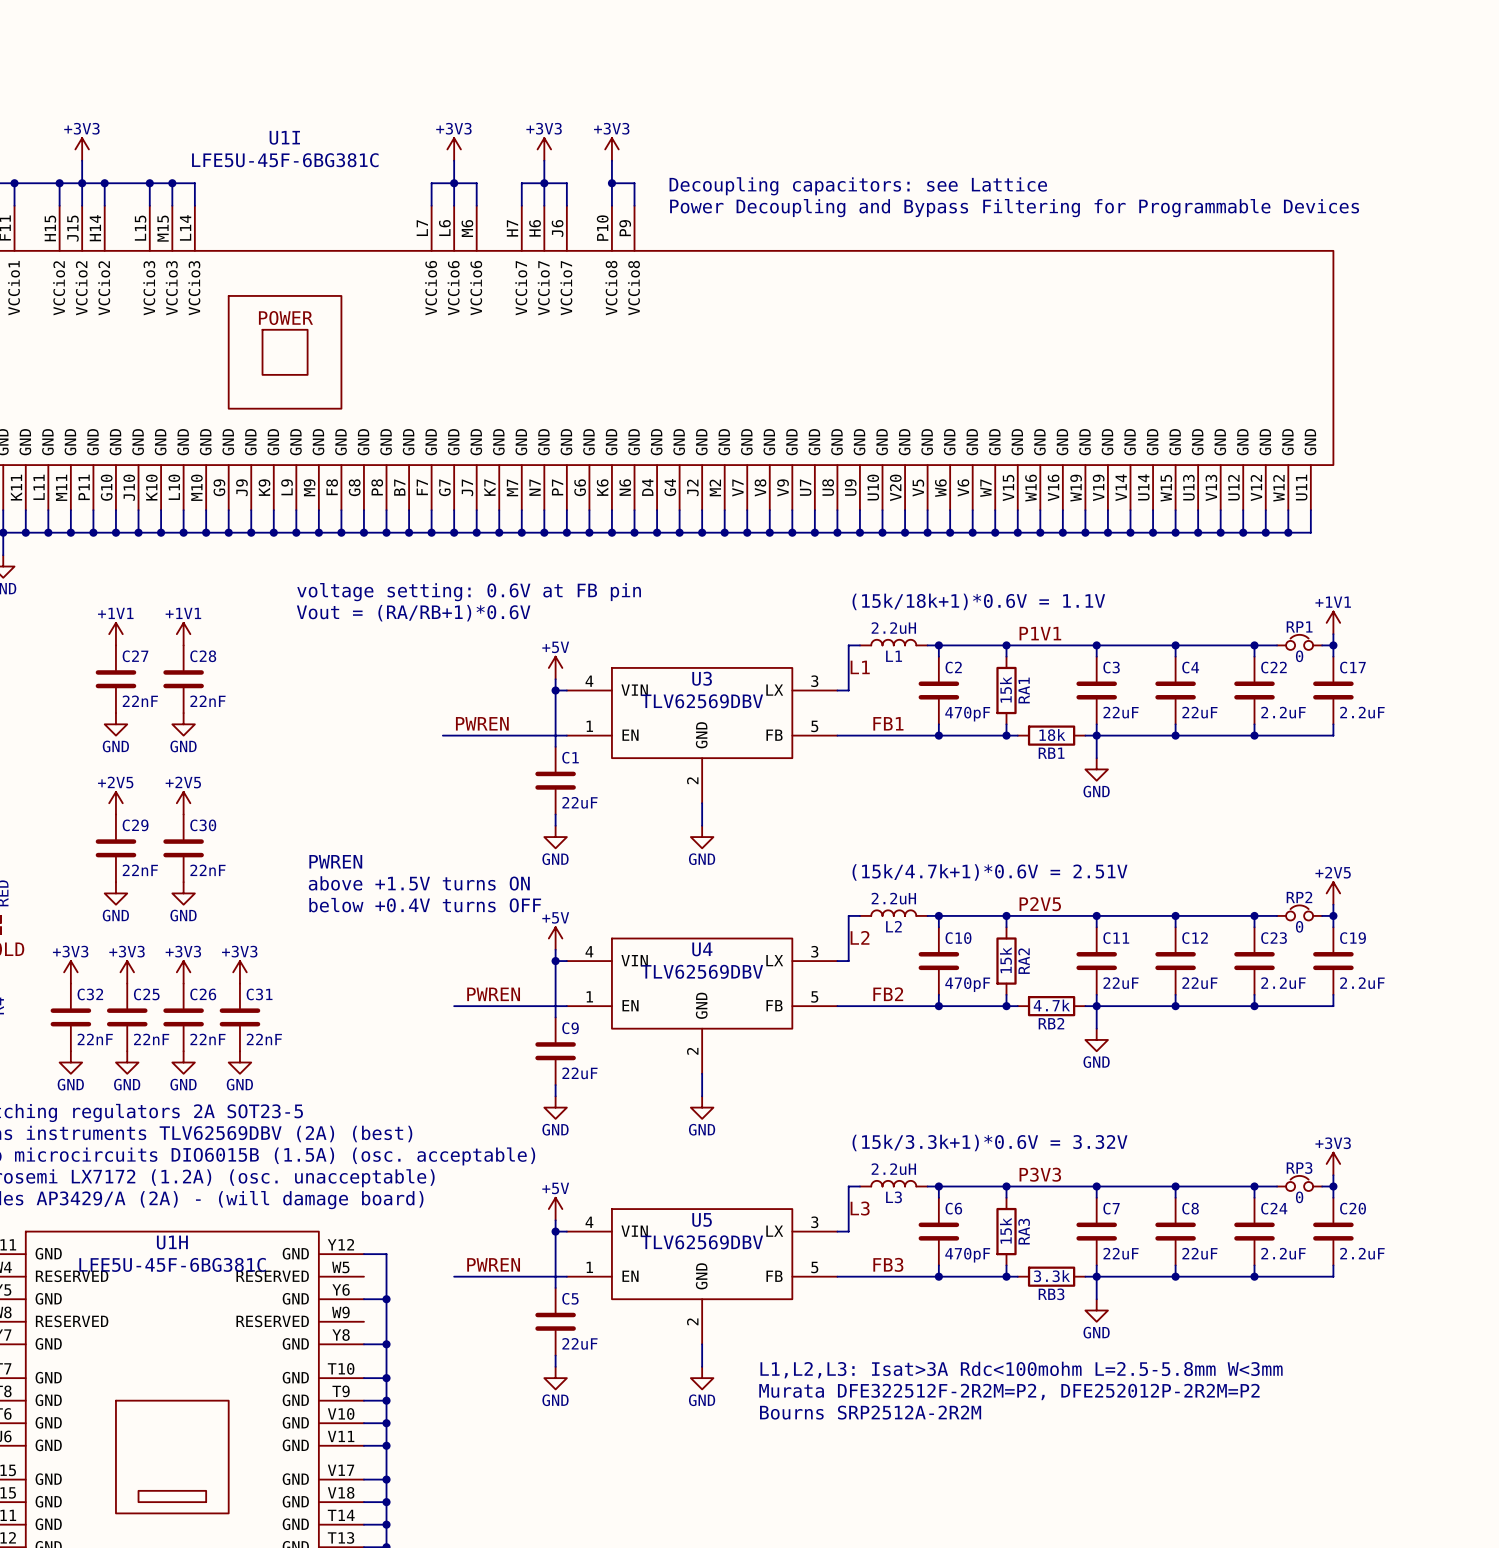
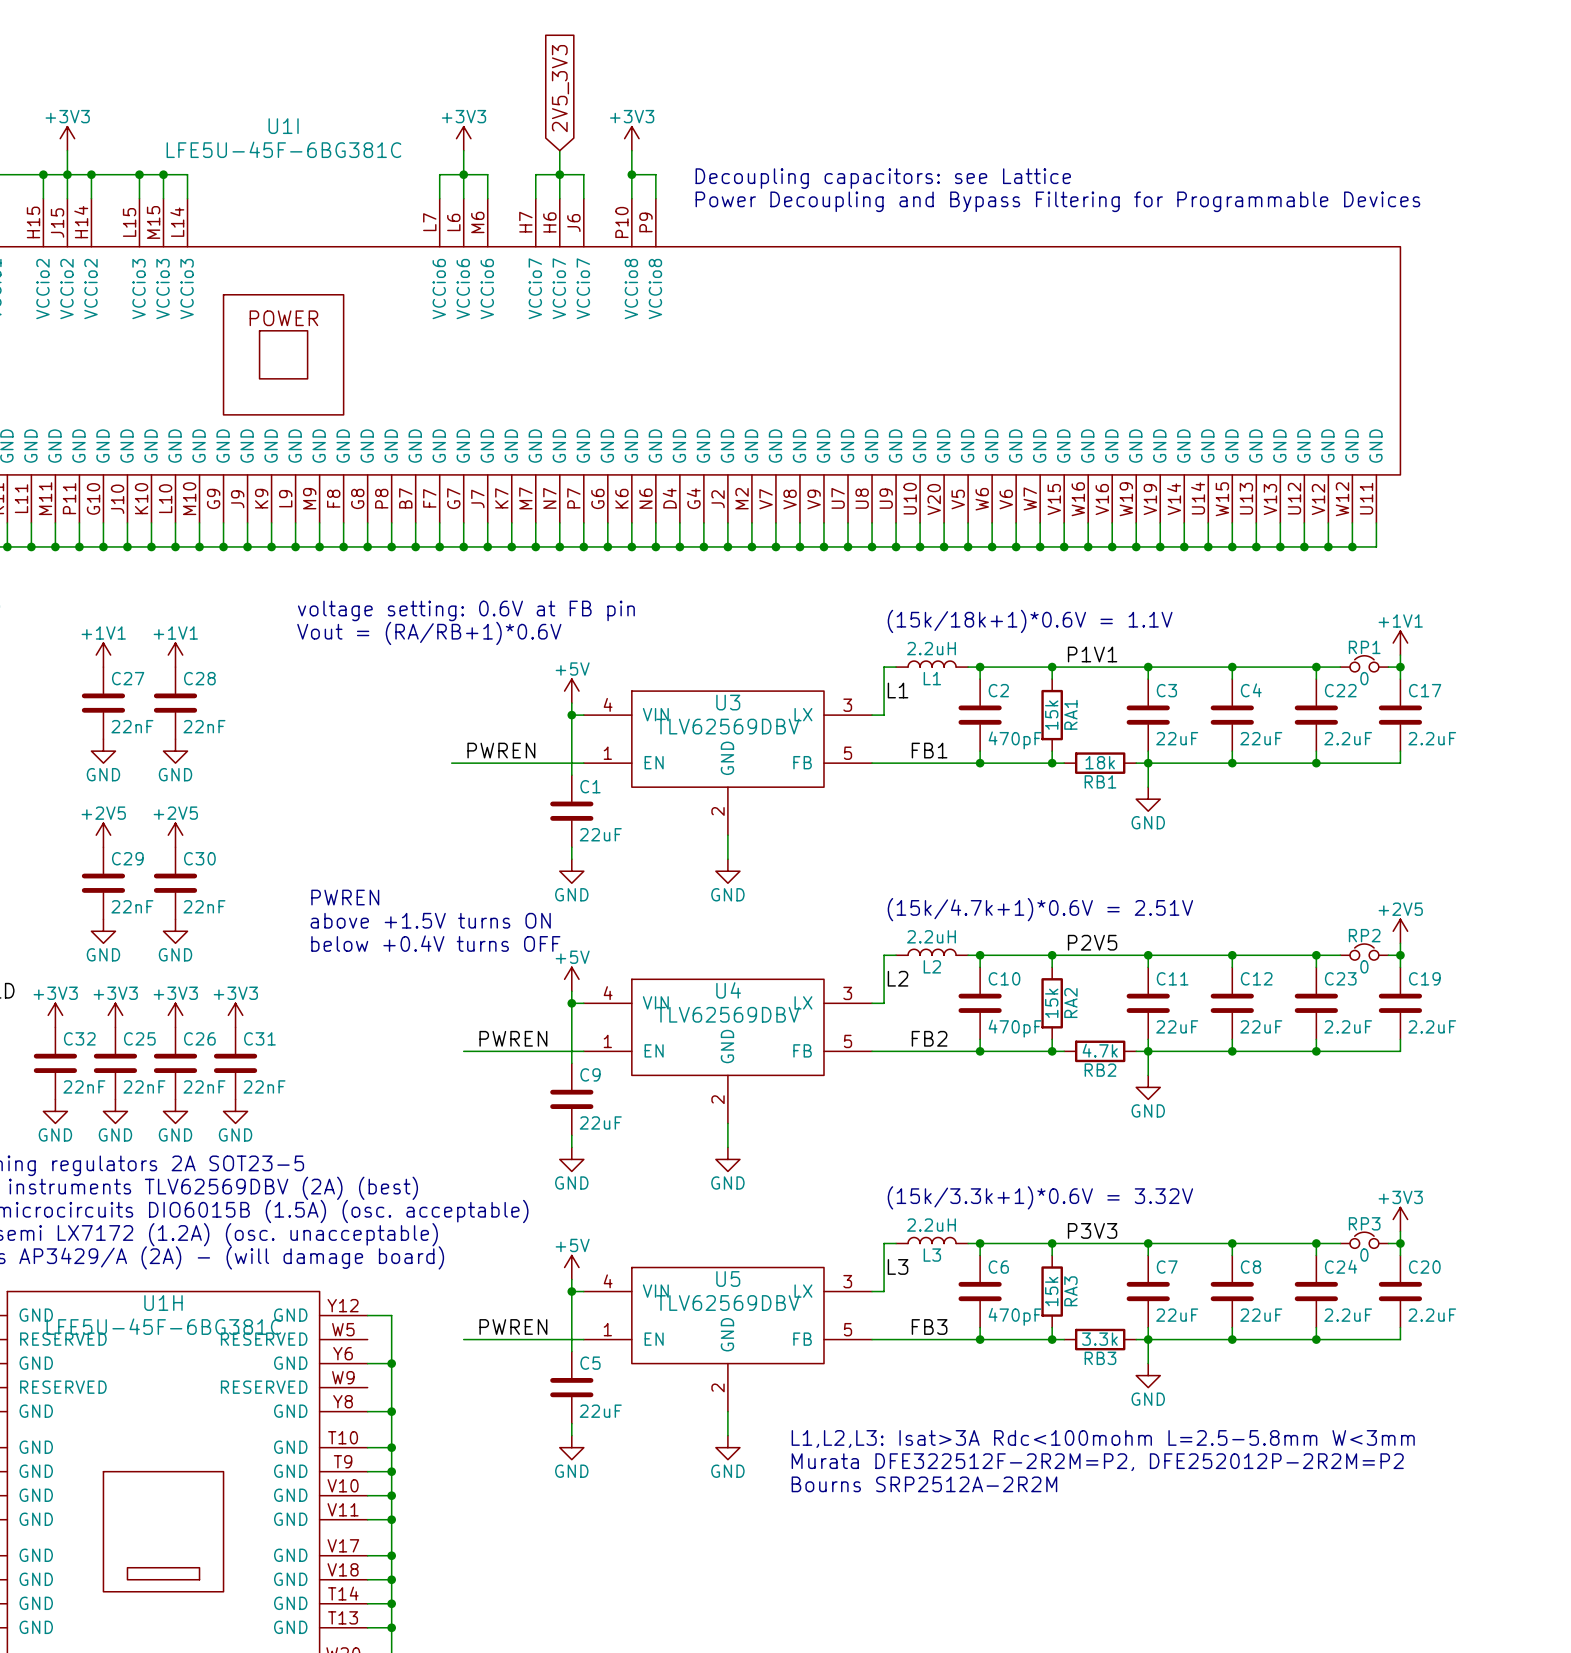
global label: none -> 2V5_3V3 (560, 88)
power symbol: +3V3 (544, 149) -> none

